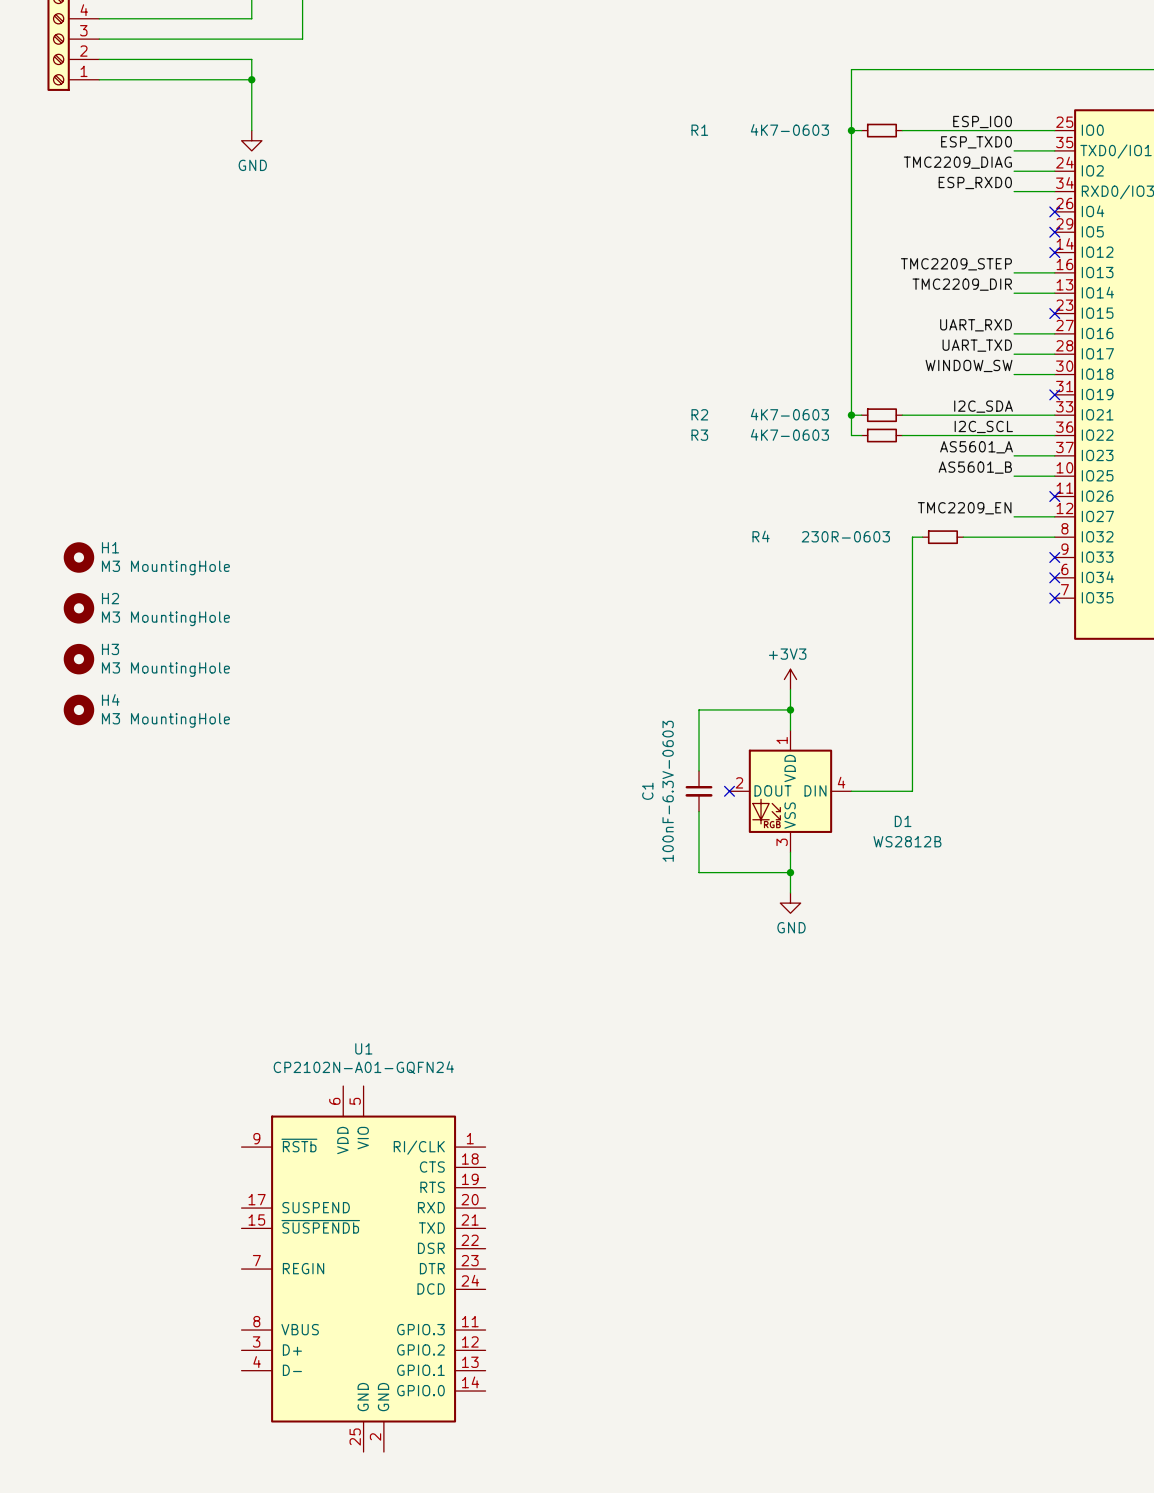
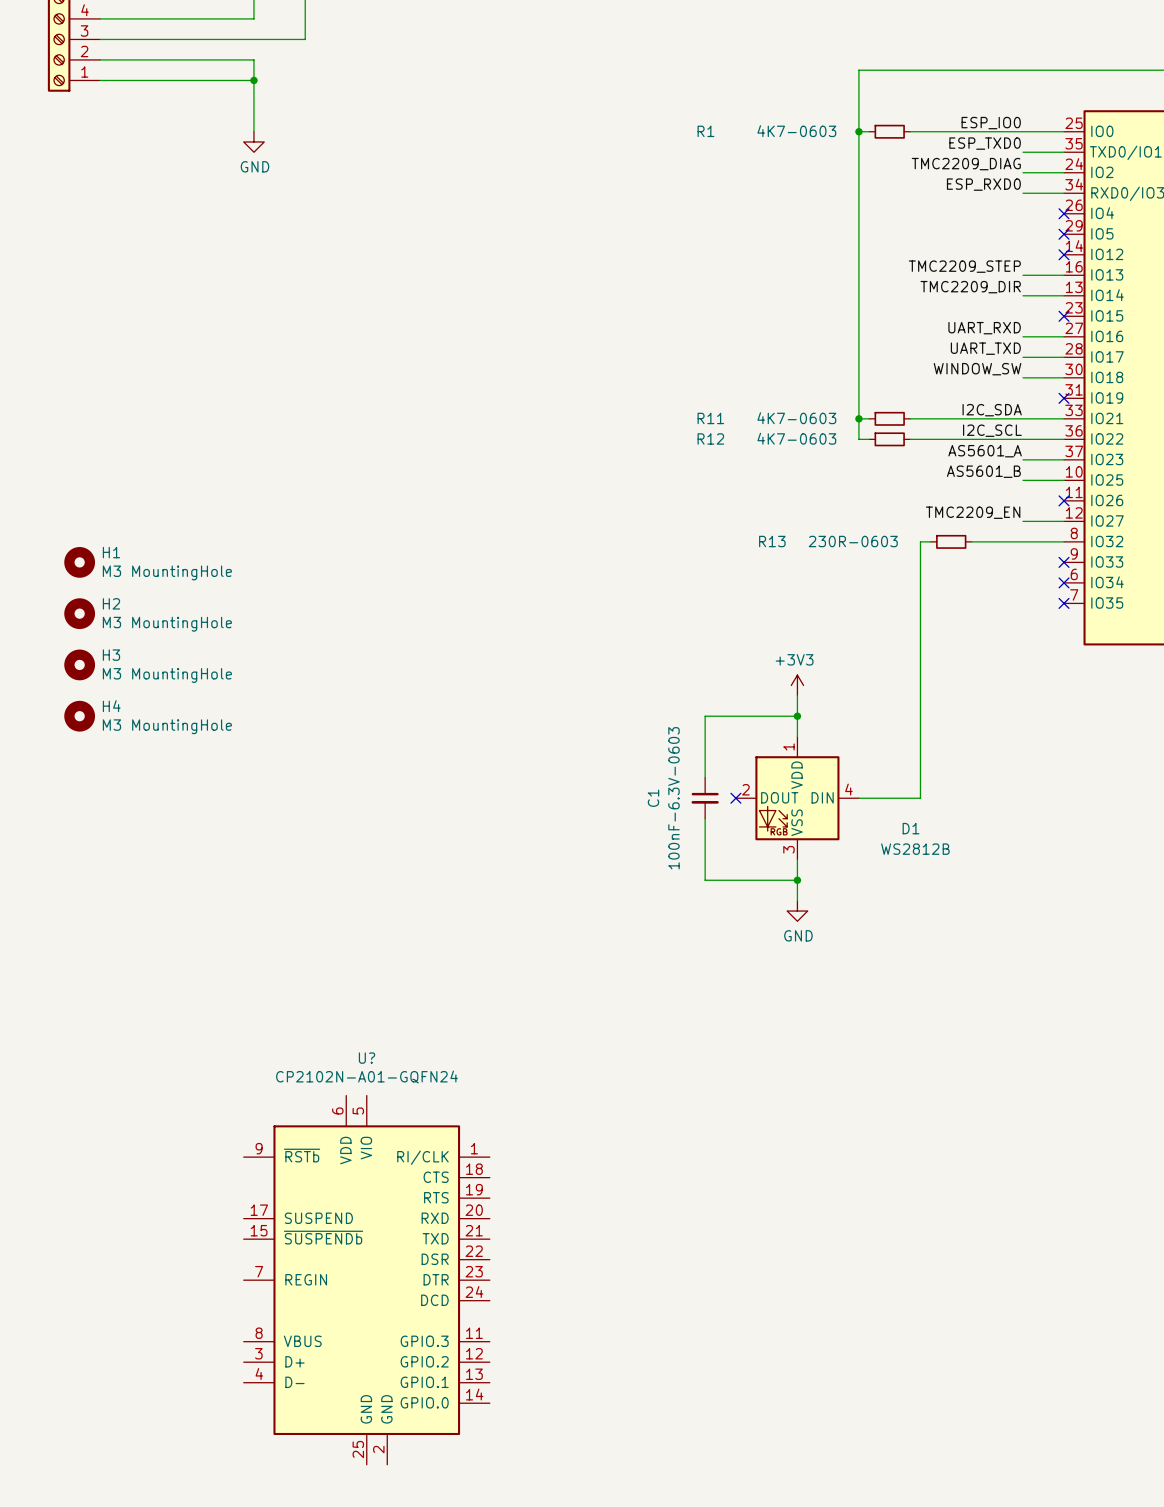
R2 name: R2 (699, 414) -> R11 (710, 418)
R3 name: R3 (699, 435) -> R12 (710, 438)
R4 name: R4 (761, 536) -> R13 (772, 541)
U1 name: U1 (363, 1048) -> U? (367, 1058)

